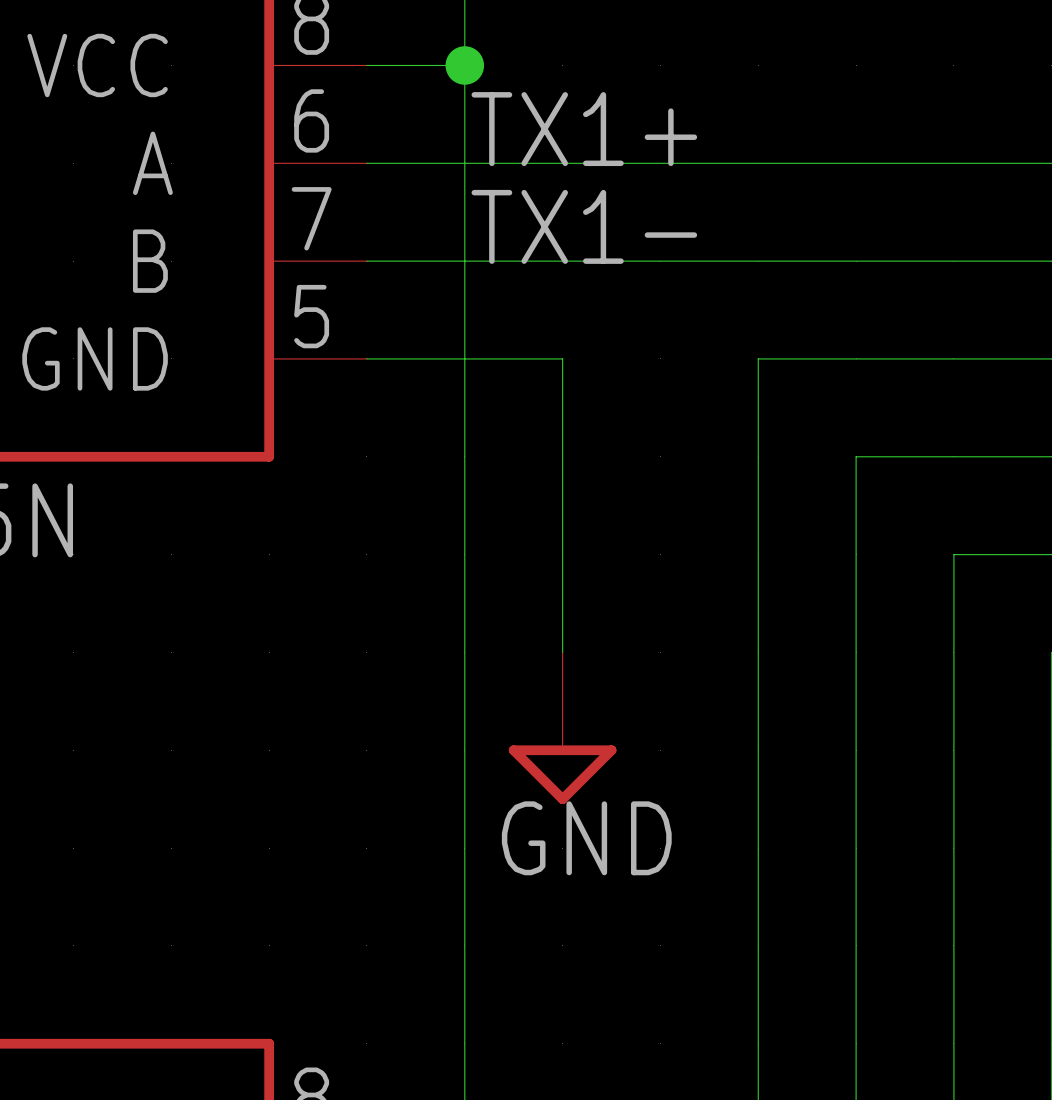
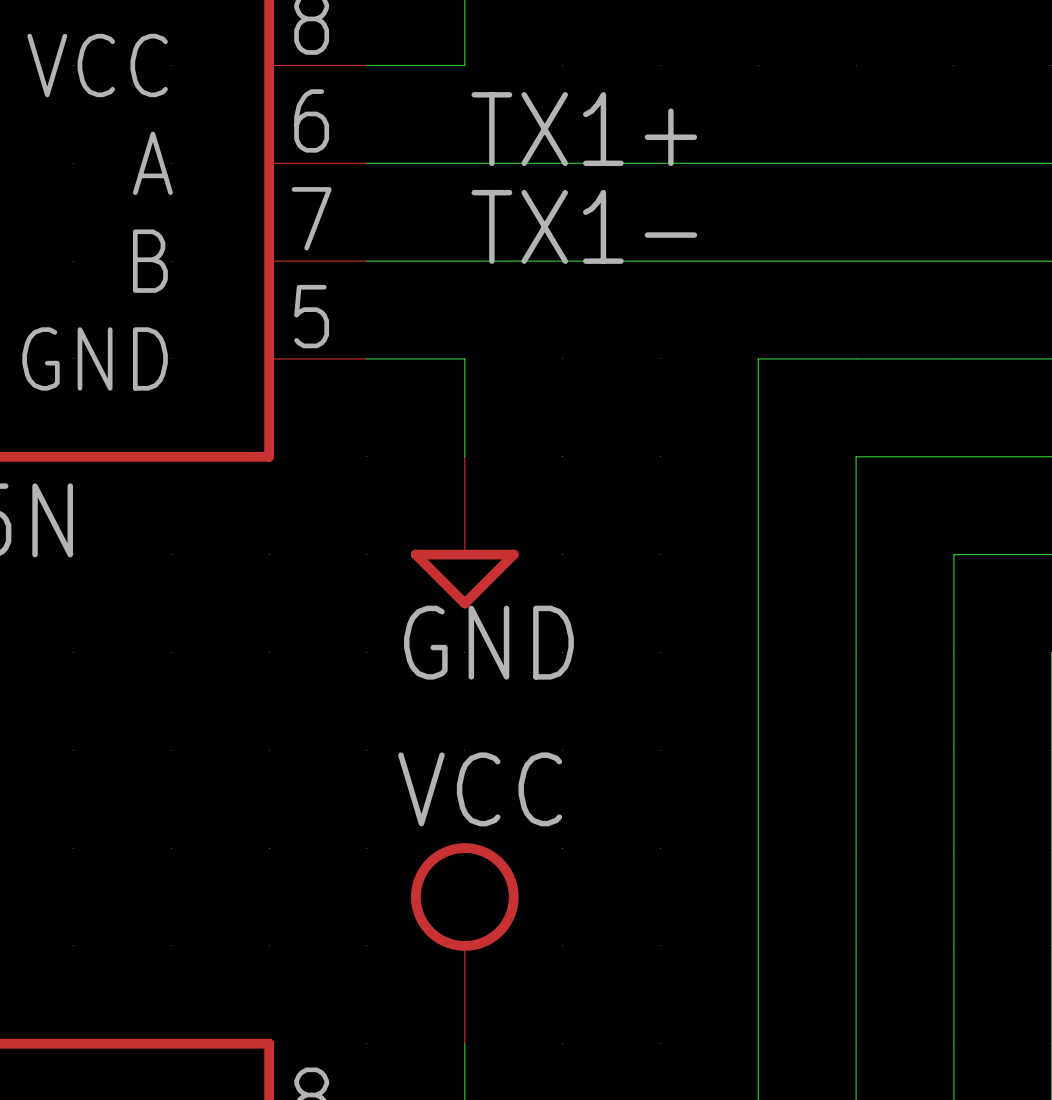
wire: (464, 65) (464, 358) (562, 358) (562, 652) -> none
junction: (464, 65) -> none
wire: (464, 456) (464, 1043) -> none
power symbol position: GND (562, 728) -> GND (464, 532)
power symbol: none -> VCC (464, 943)

